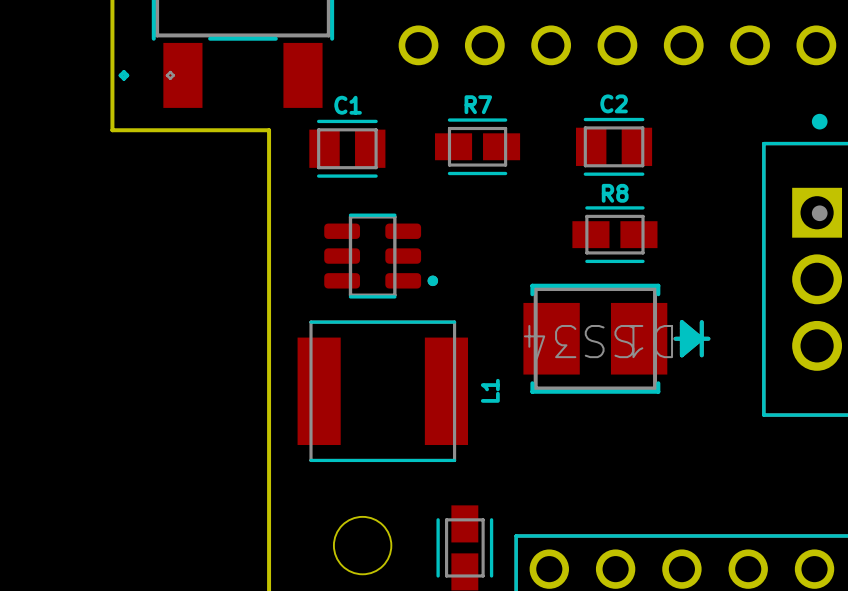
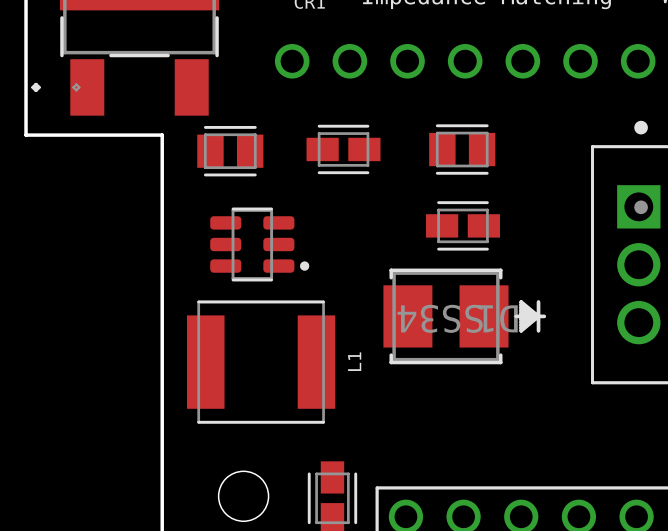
C2 name: C2 (614, 103) -> none
R7 name: R7 (478, 104) -> none
C1 name: C1 (348, 105) -> none
R8 name: R8 (615, 193) -> none

